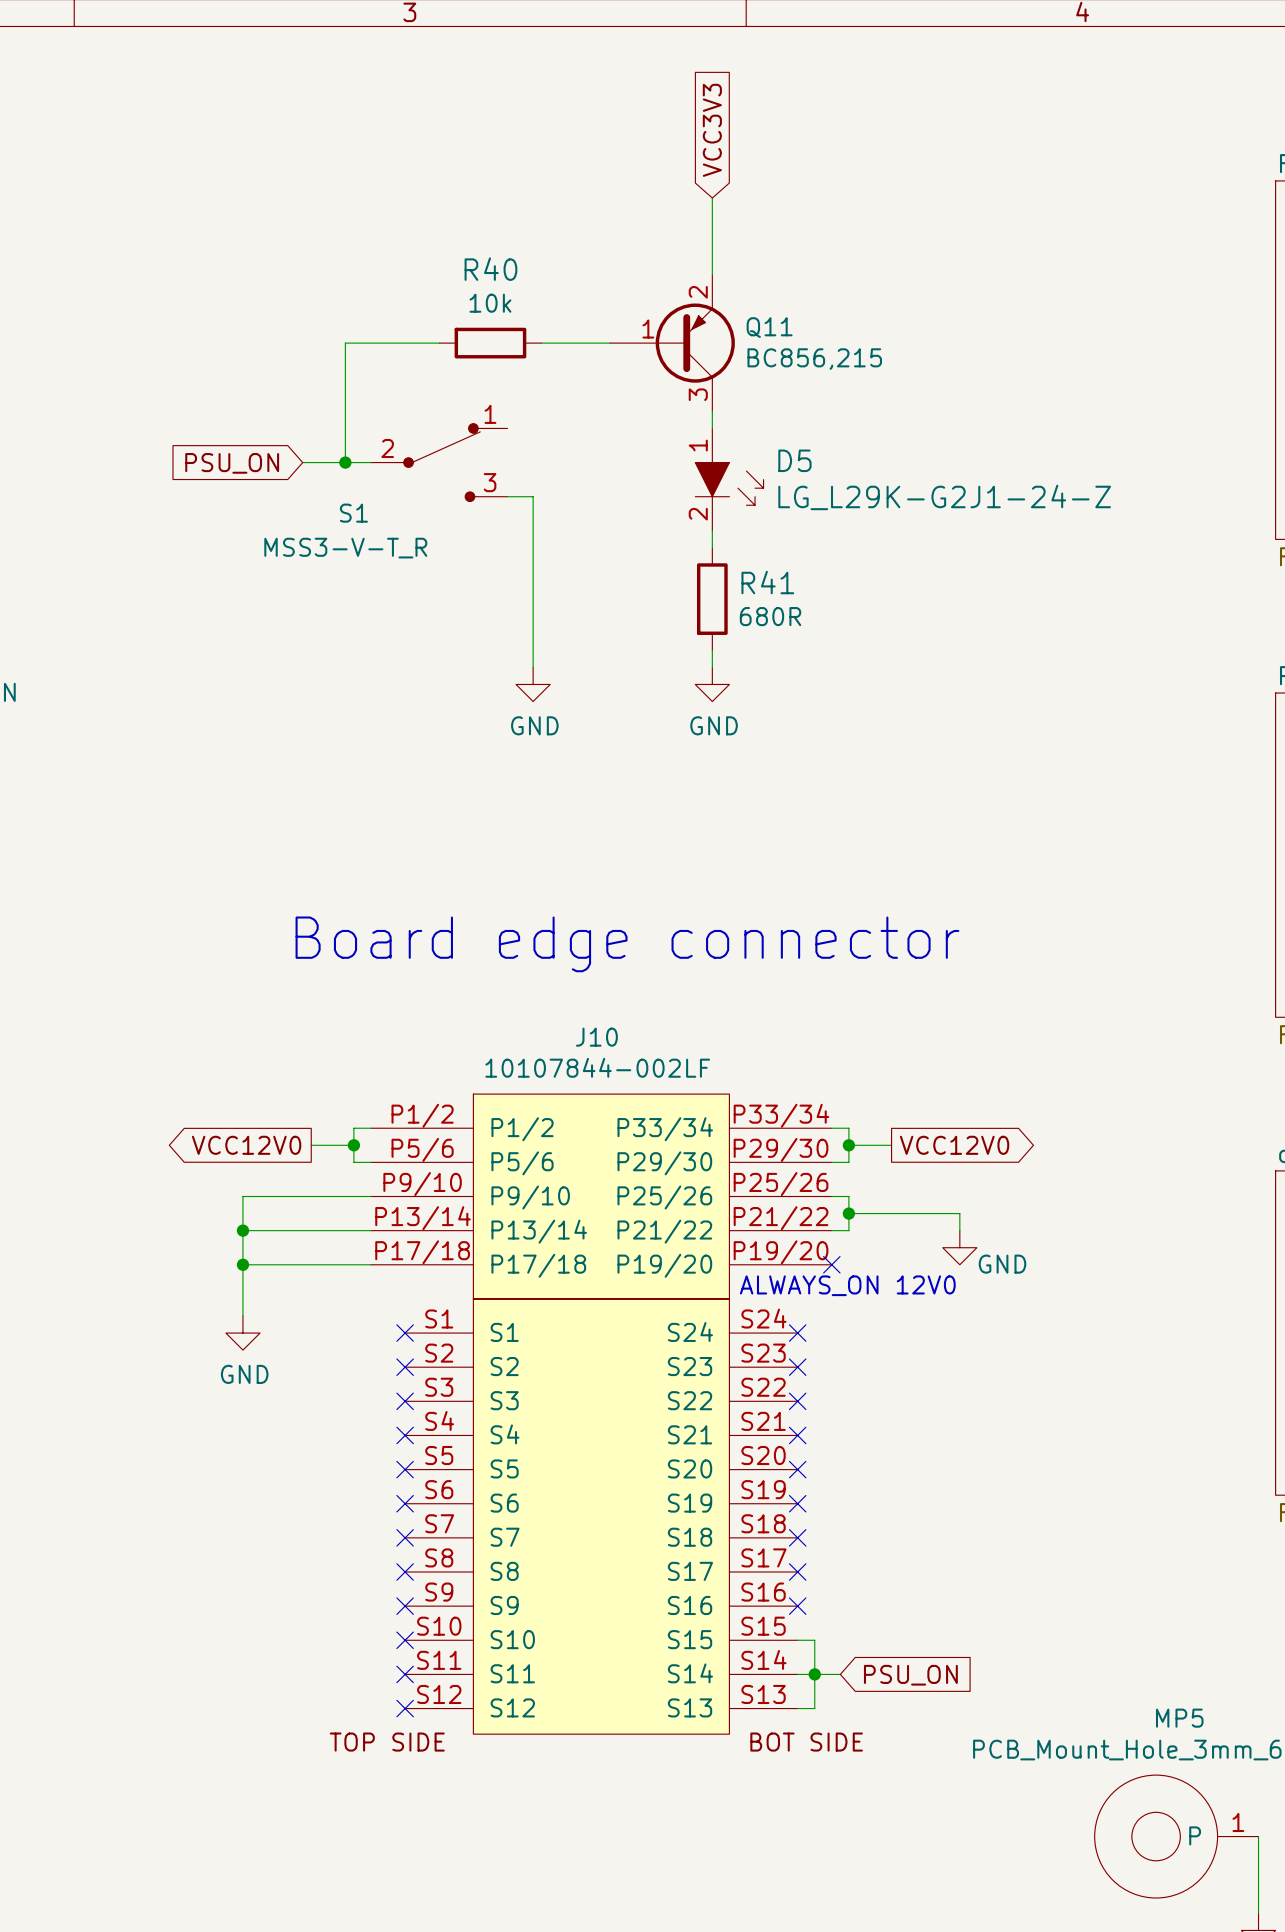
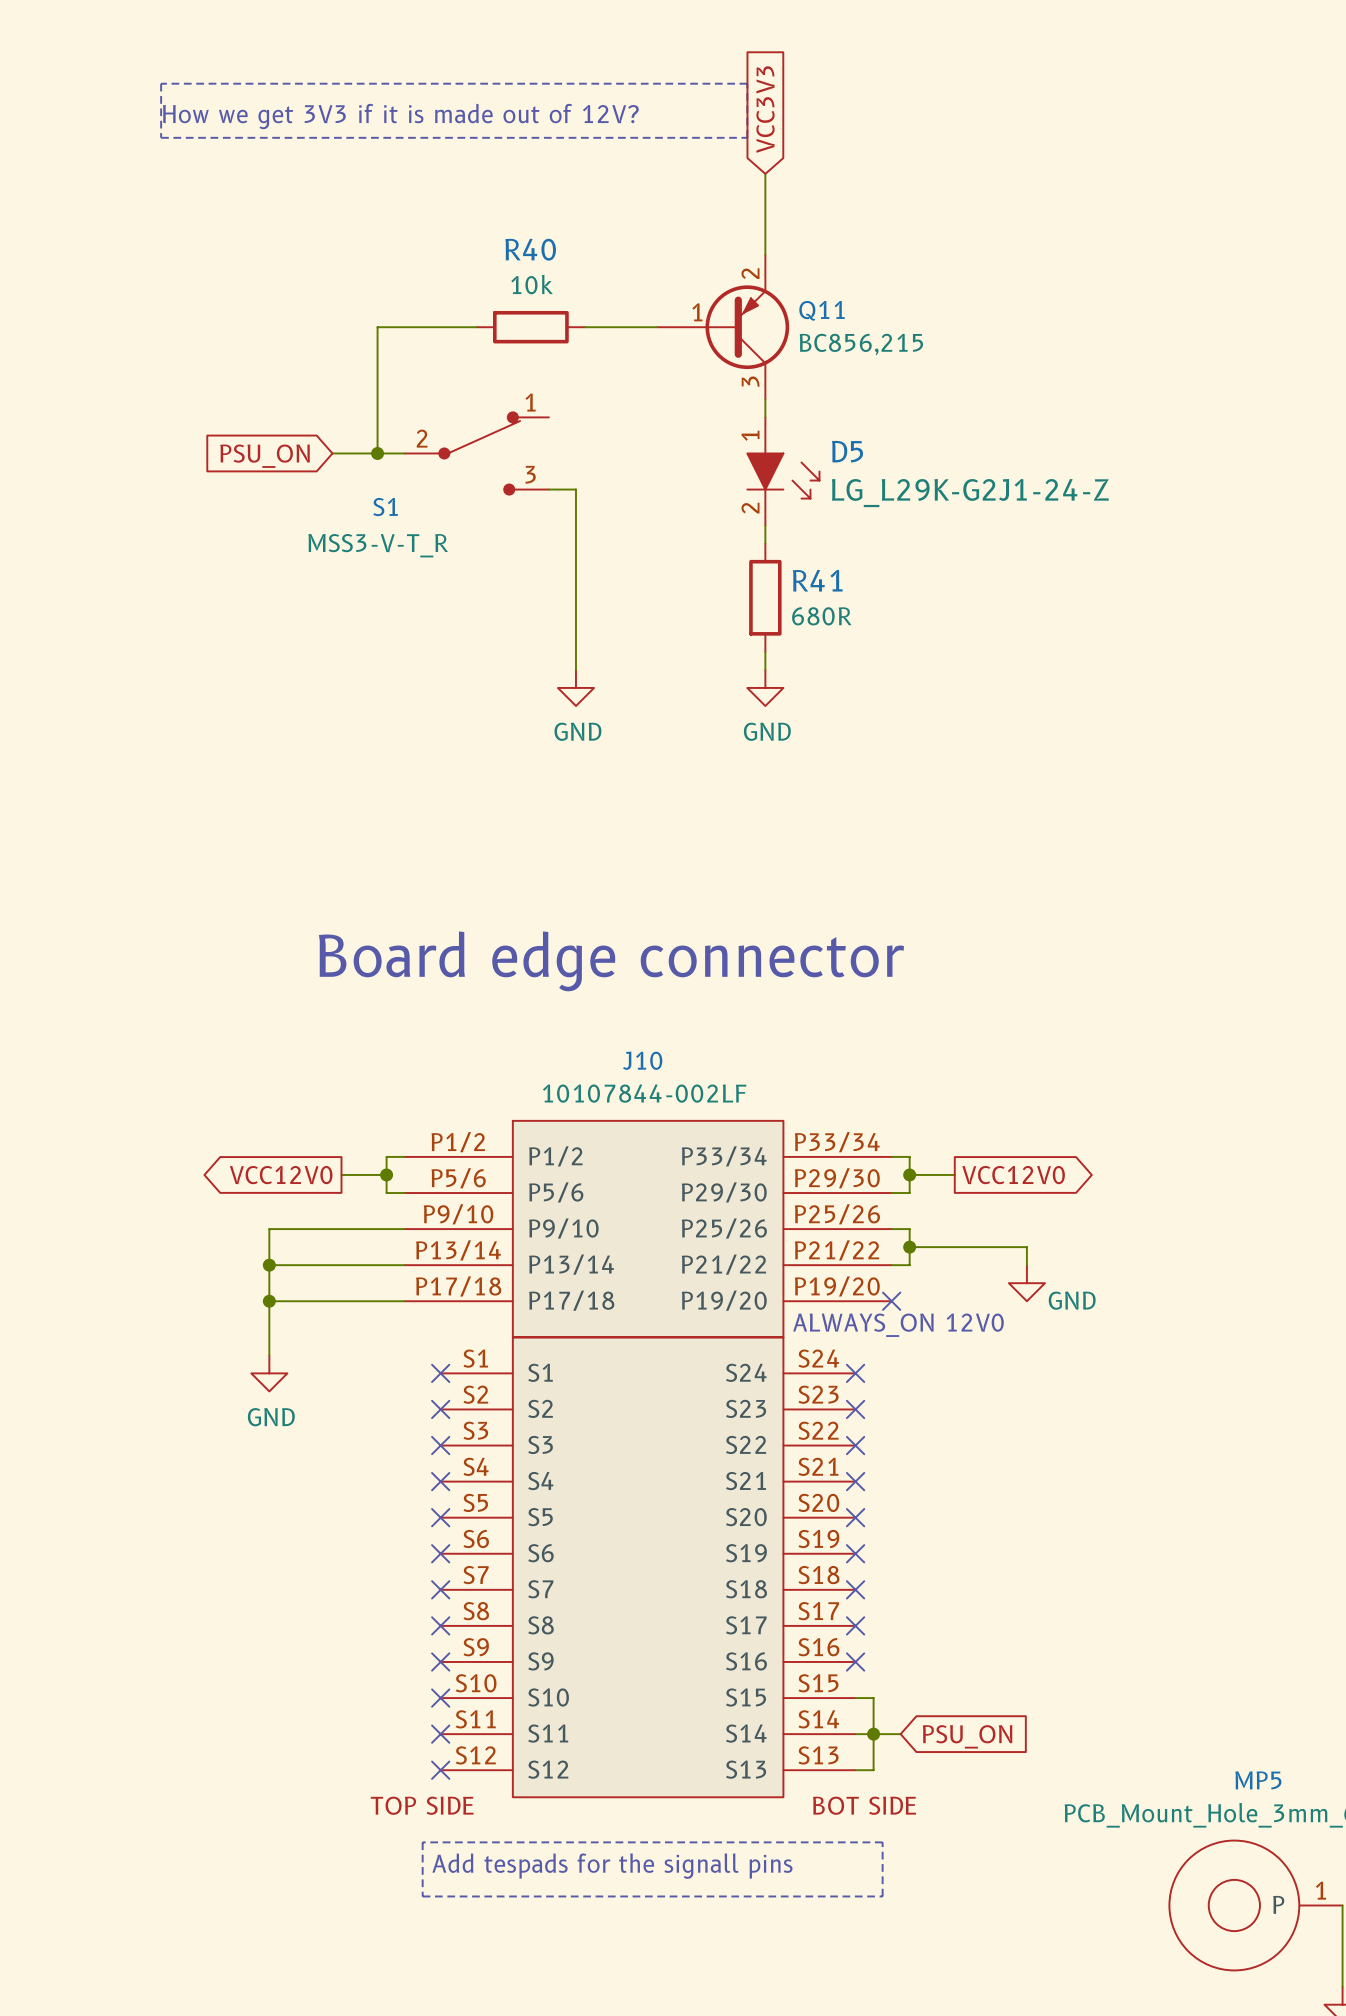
line: none -> (161, 83) (161, 137) (747, 137) (747, 83) (161, 83)
text: none -> How we get 3V3 if it is made out of 12V? (400, 116)
line: none -> (422, 1842) (422, 1896) (882, 1896) (882, 1842) (422, 1842)
text: none -> Add tespads for the signall pins (612, 1866)

